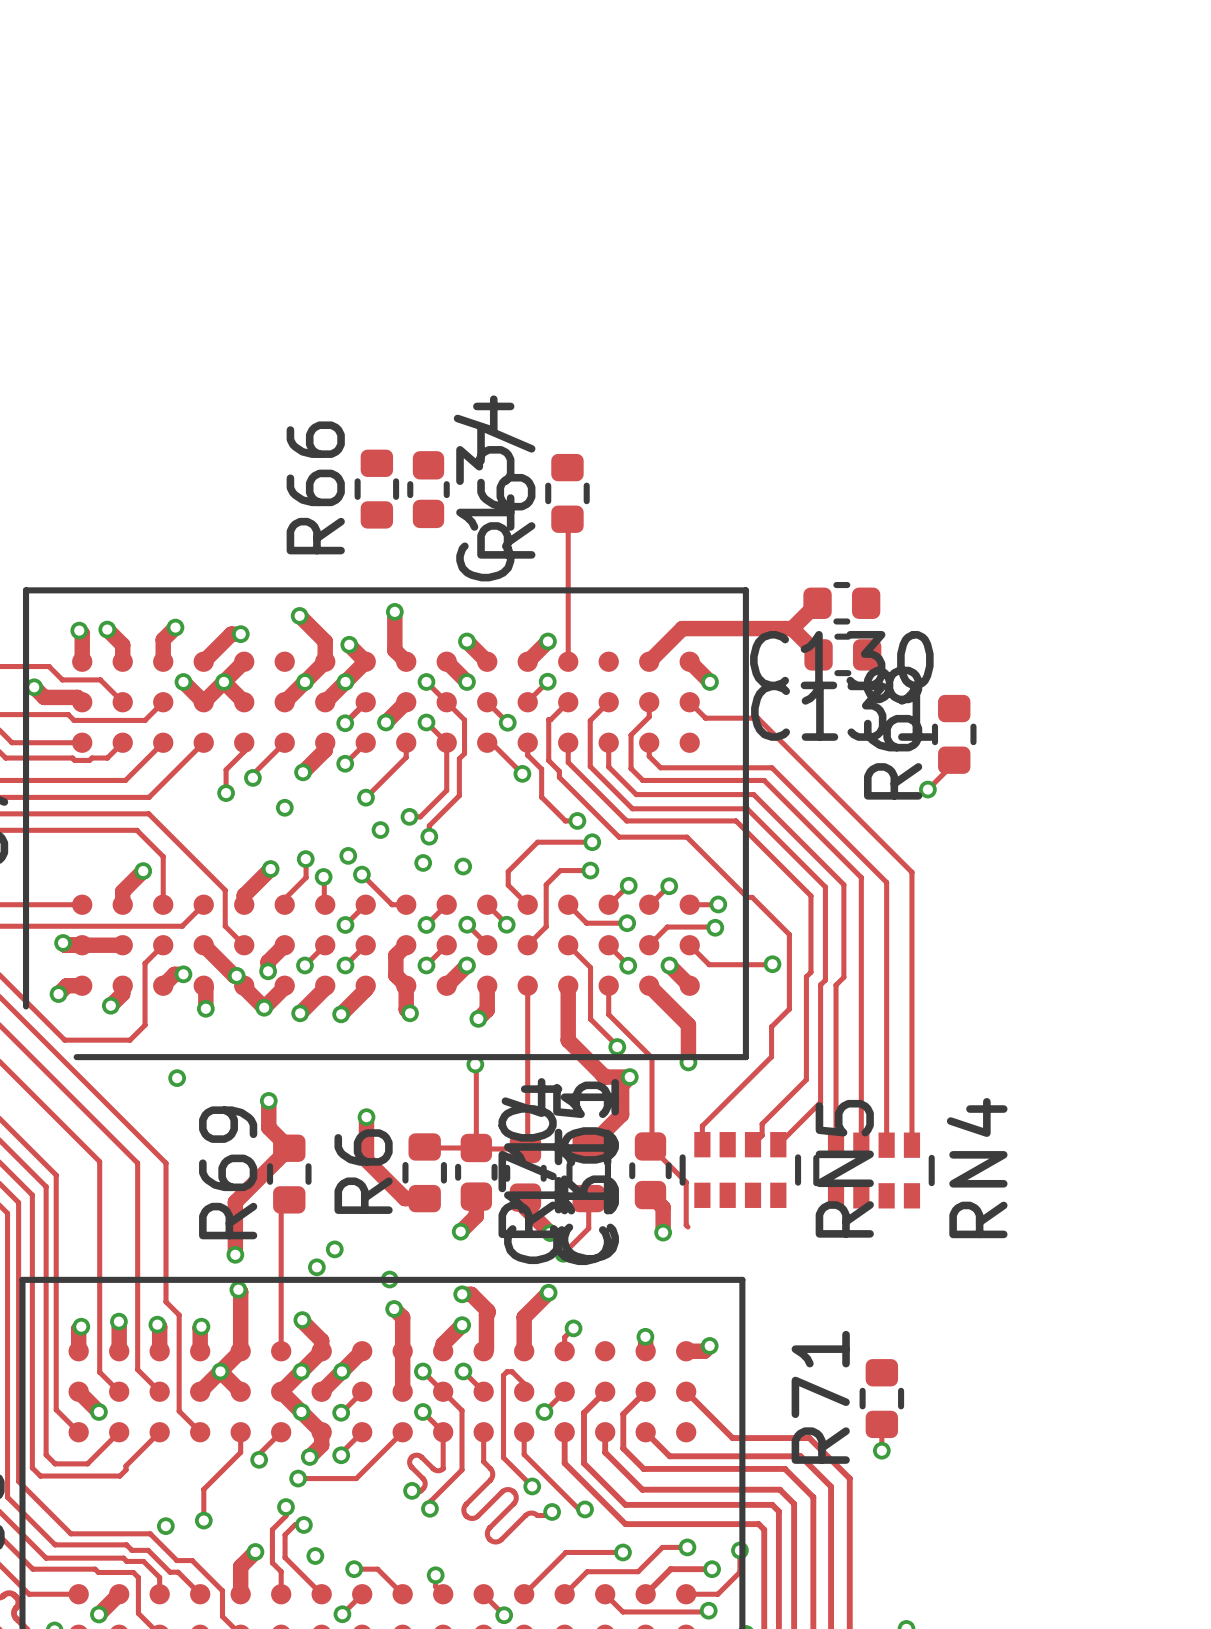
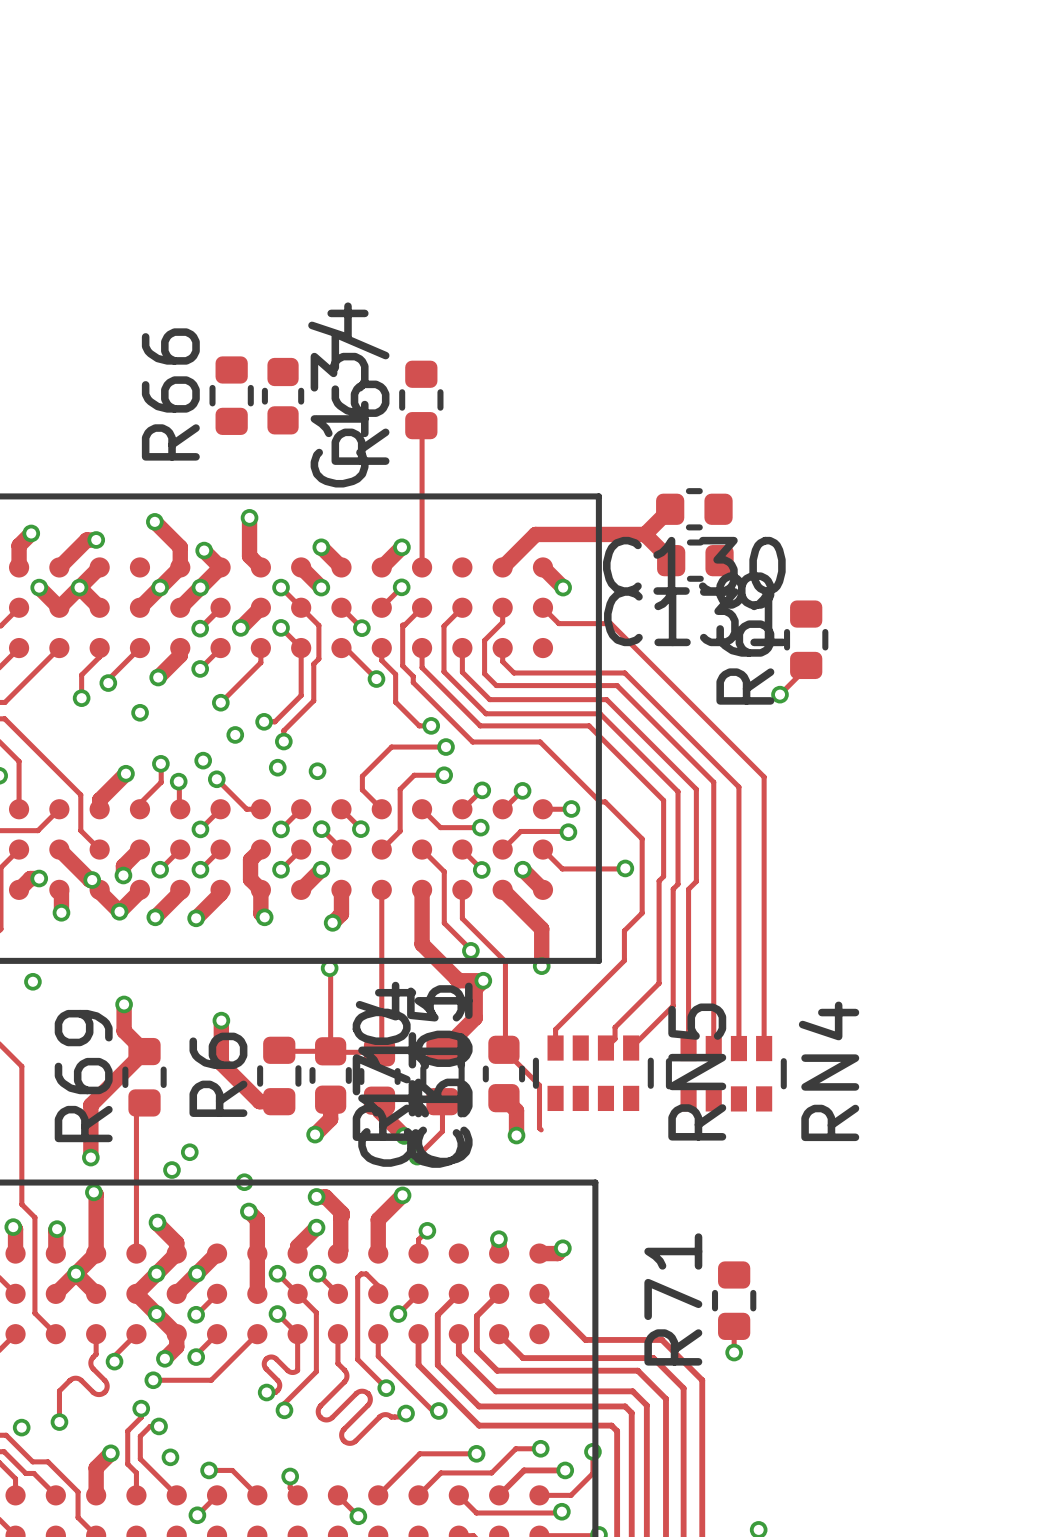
track: (237, 1455) (214, 1478) -> (93, 1357) (91, 1365) (106, 1382) (107, 1387) (104, 1392) (96, 1394) (79, 1379) (73, 1378) (69, 1380)

